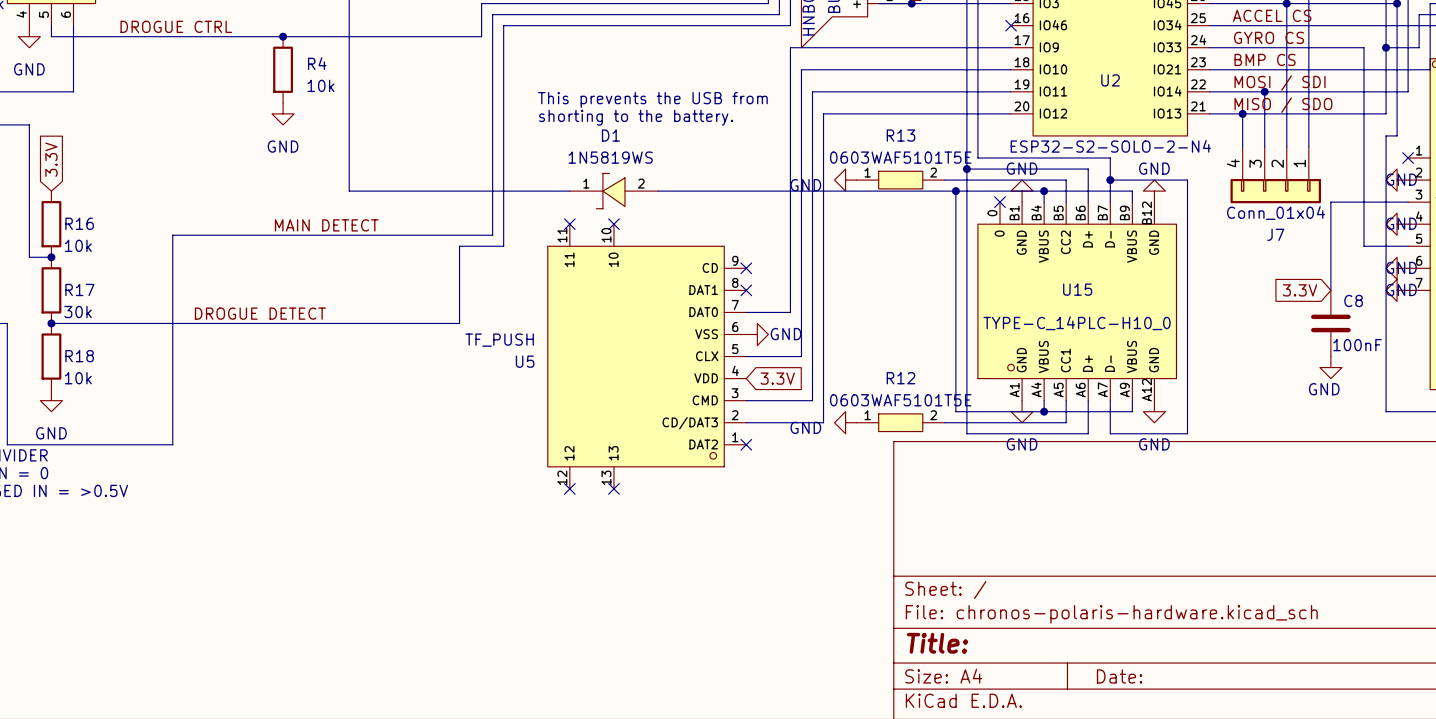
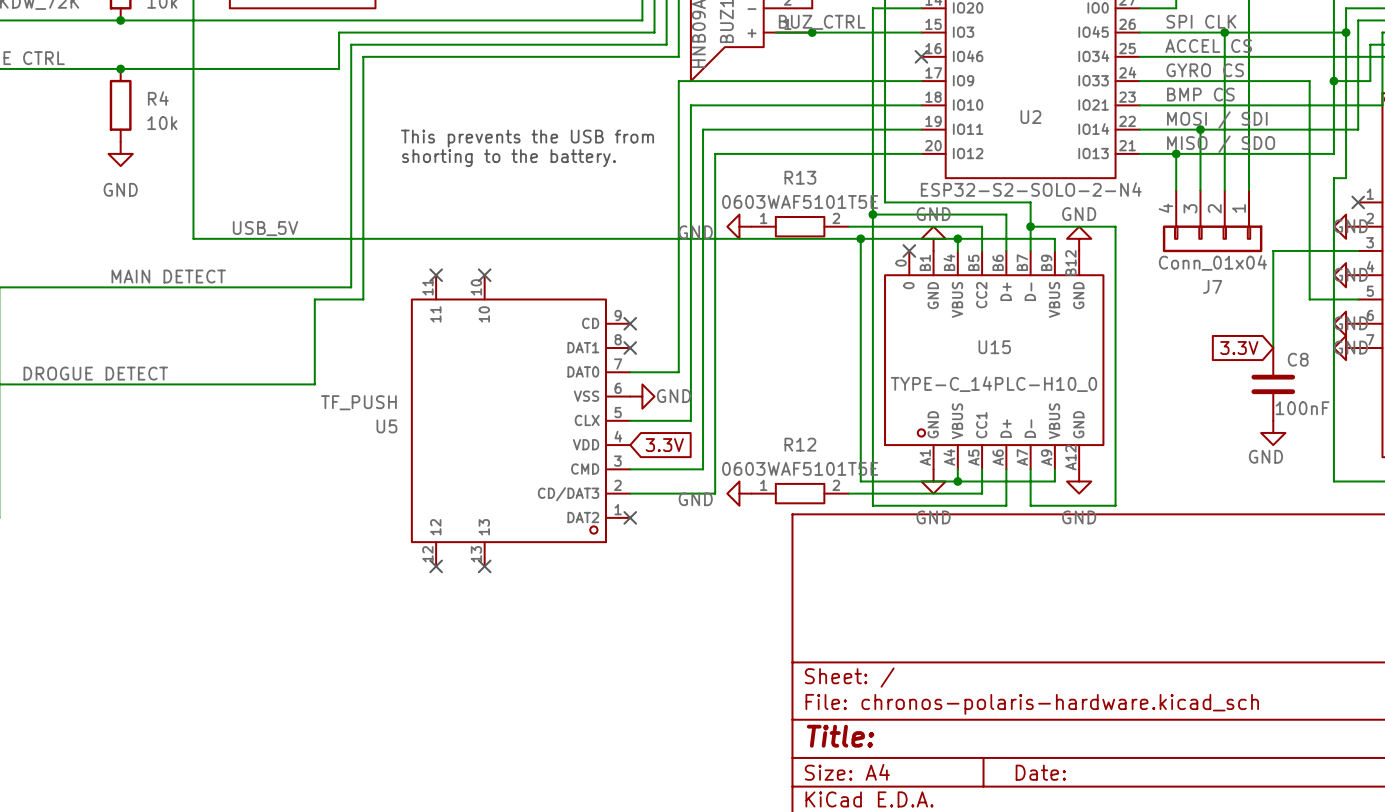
label: none -> USB_5V (265, 228)
D1: 1N5819WS (613, 191) -> none

